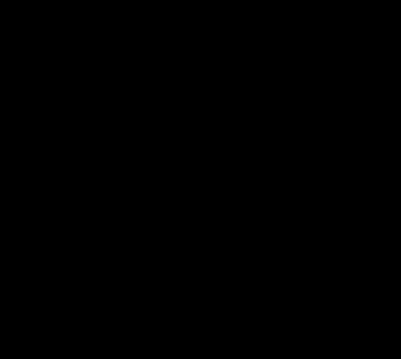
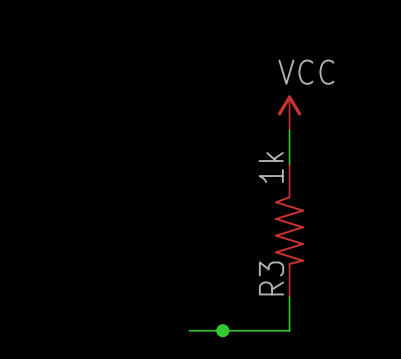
power symbol: none -> VCC (289, 113)
wire: none -> (289, 130) (289, 163)
R3: none -> 1k (289, 230)
wire: none -> (289, 297) (289, 330) (189, 330)
junction: none -> (222, 330)

